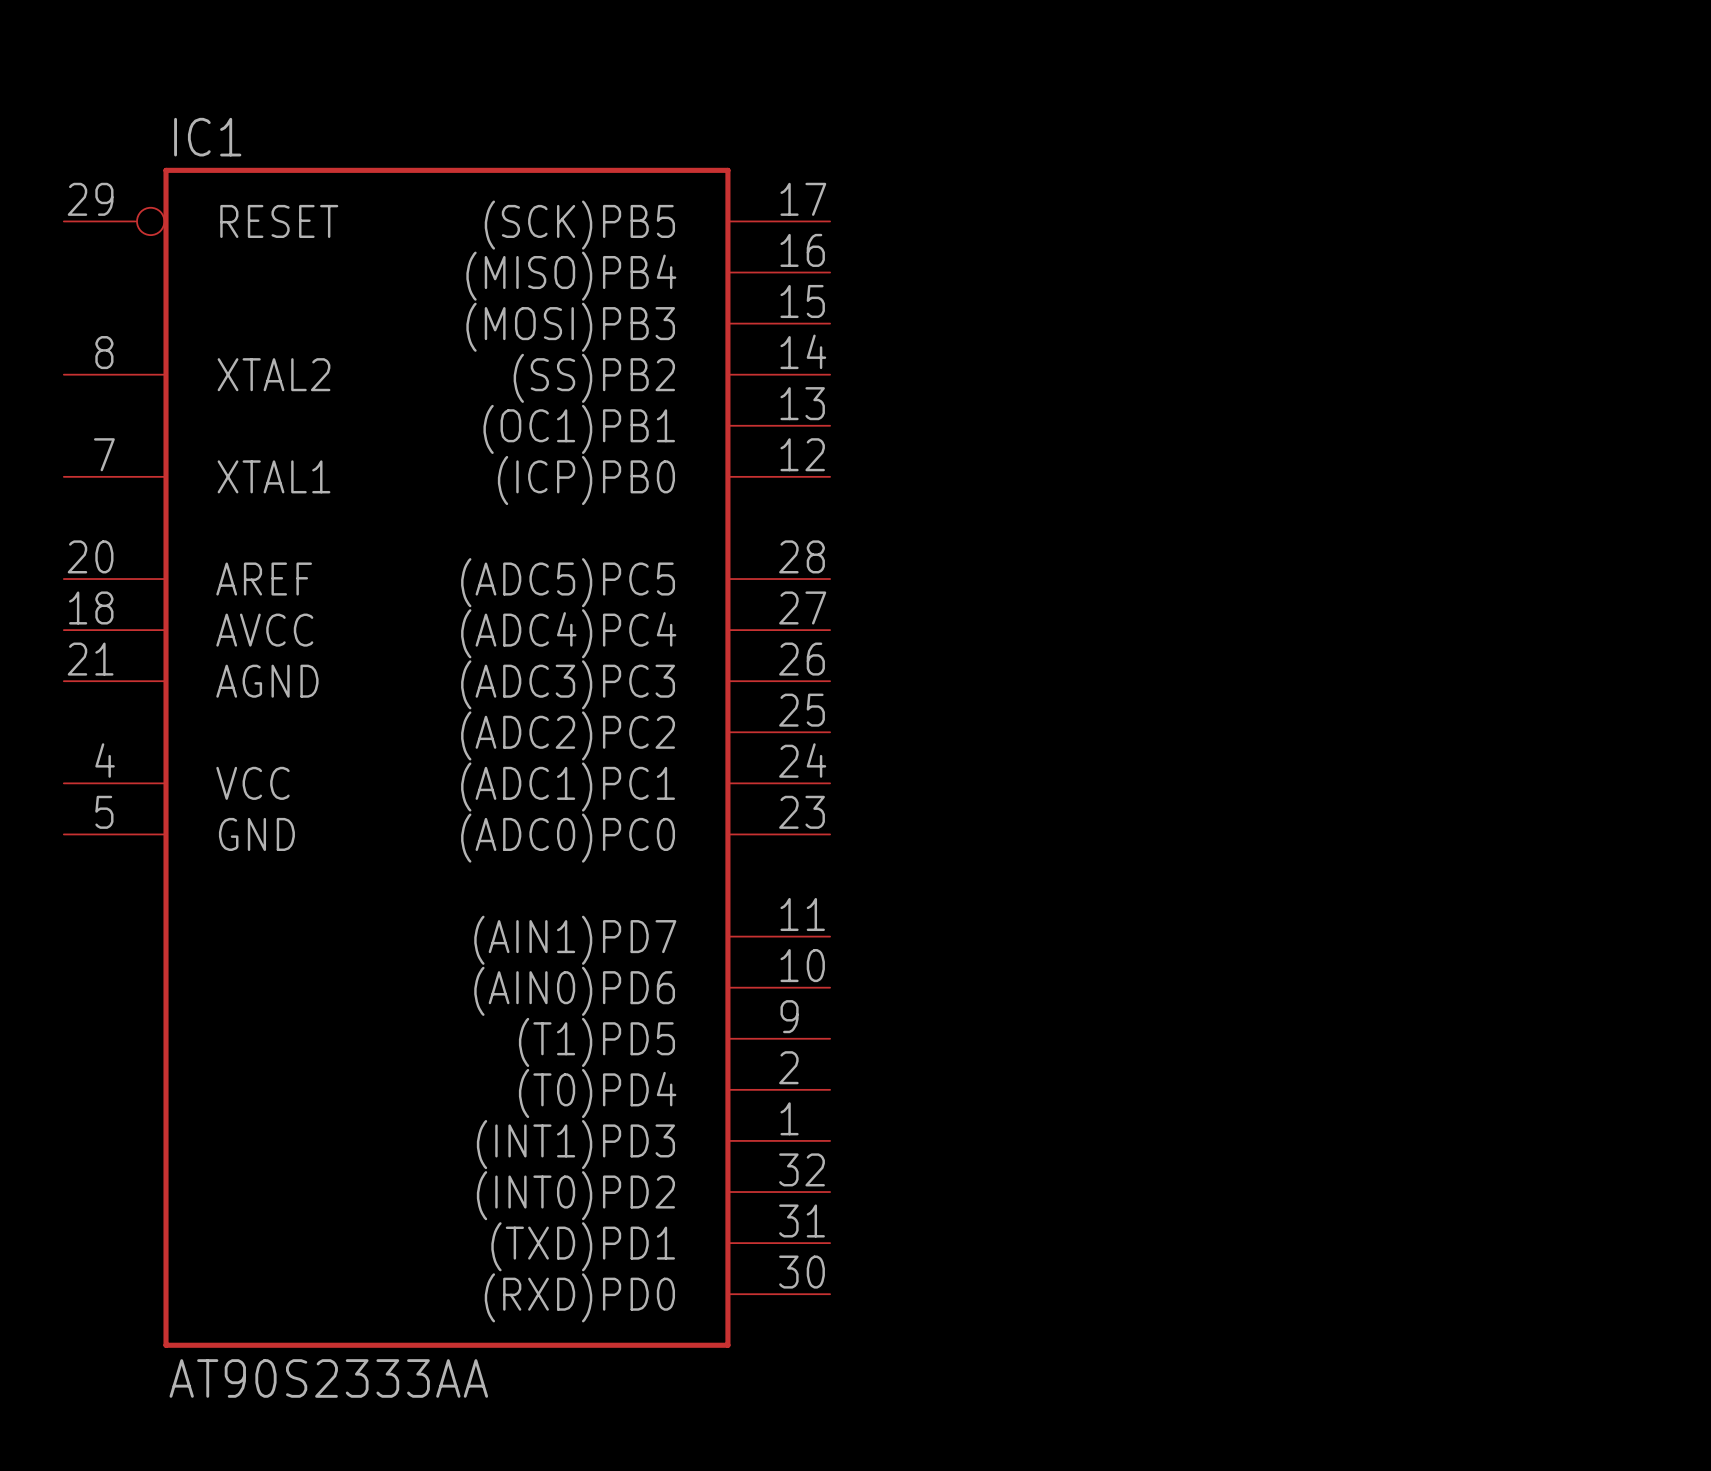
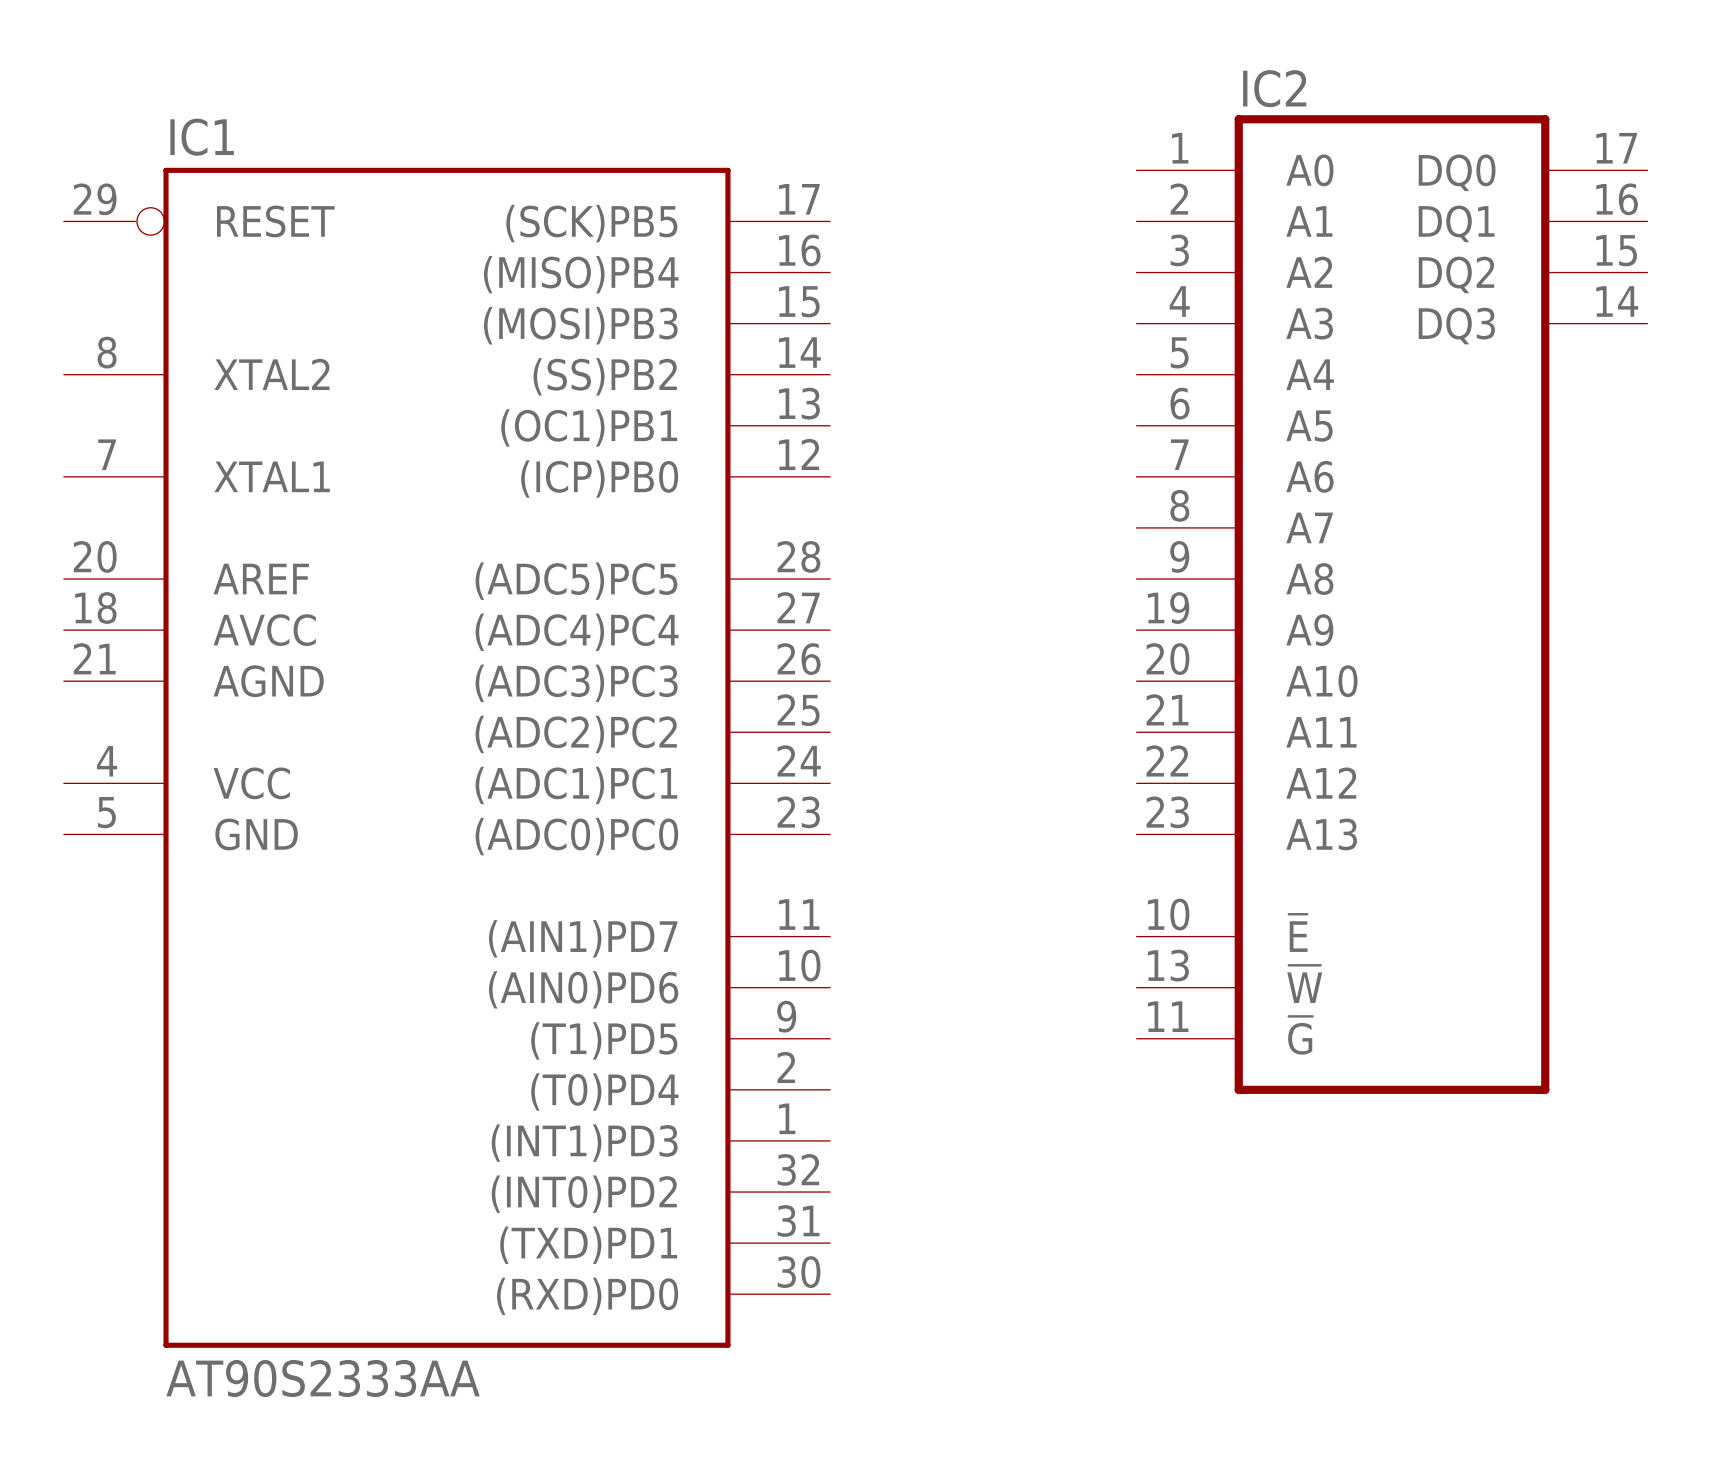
IC2: none -> (1392, 604)

